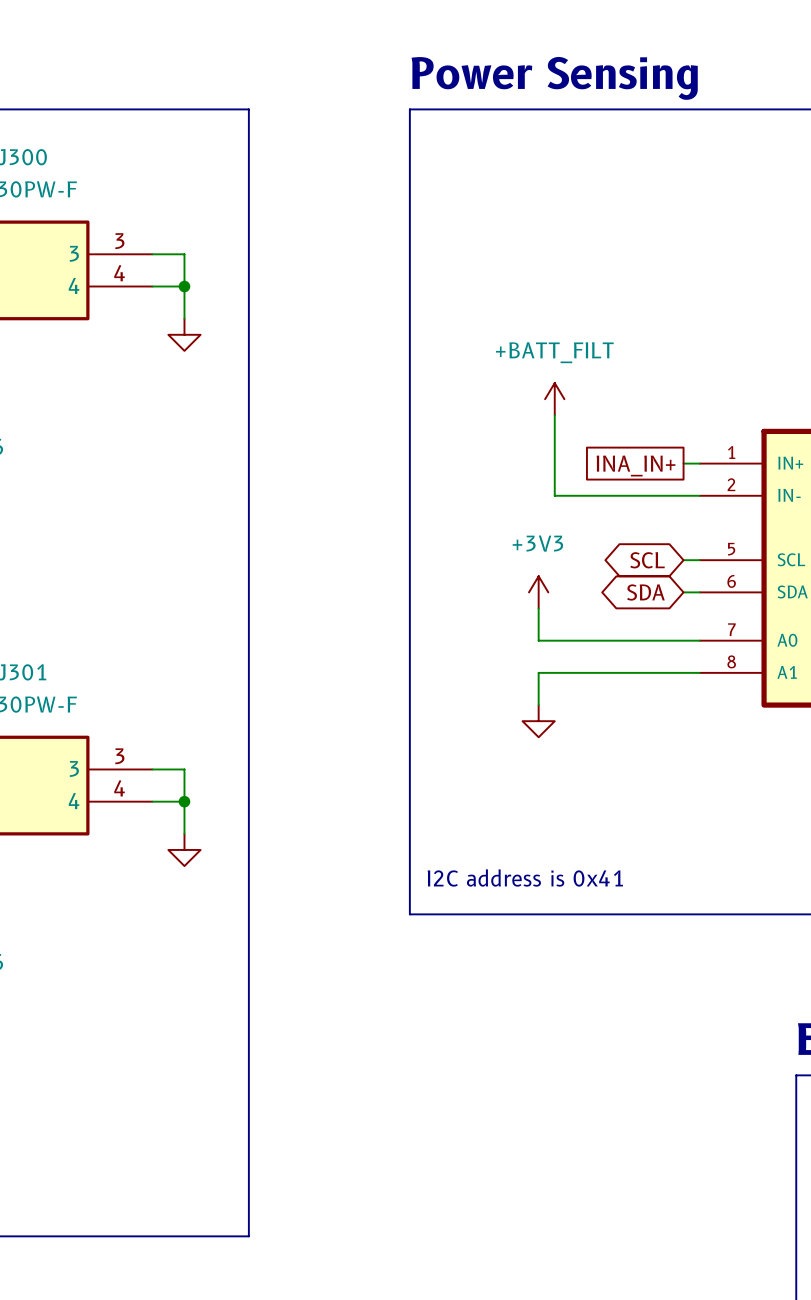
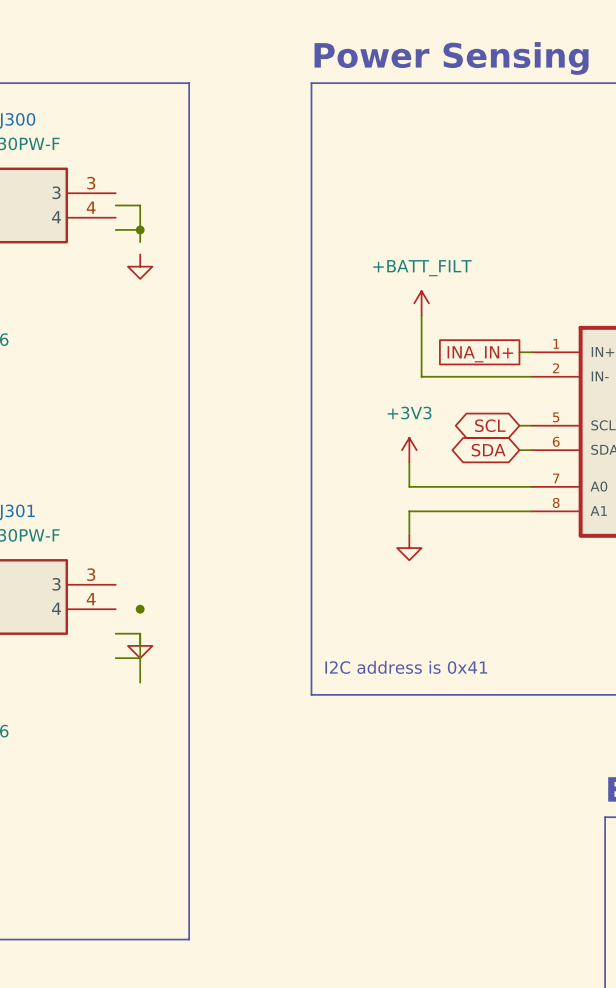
wire: (152, 254) (184, 254) (184, 270) -> (115, 205) (140, 205)
wire: (152, 286) (184, 286) -> (115, 229) (140, 229)
junction position: (184, 286) -> (140, 229)
power symbol position: (184, 334) -> (140, 266)
wire: (152, 769) (184, 769) (184, 833) -> (115, 633) (140, 633) (140, 682)
wire: (152, 801) (184, 801) -> (115, 658) (140, 658)

